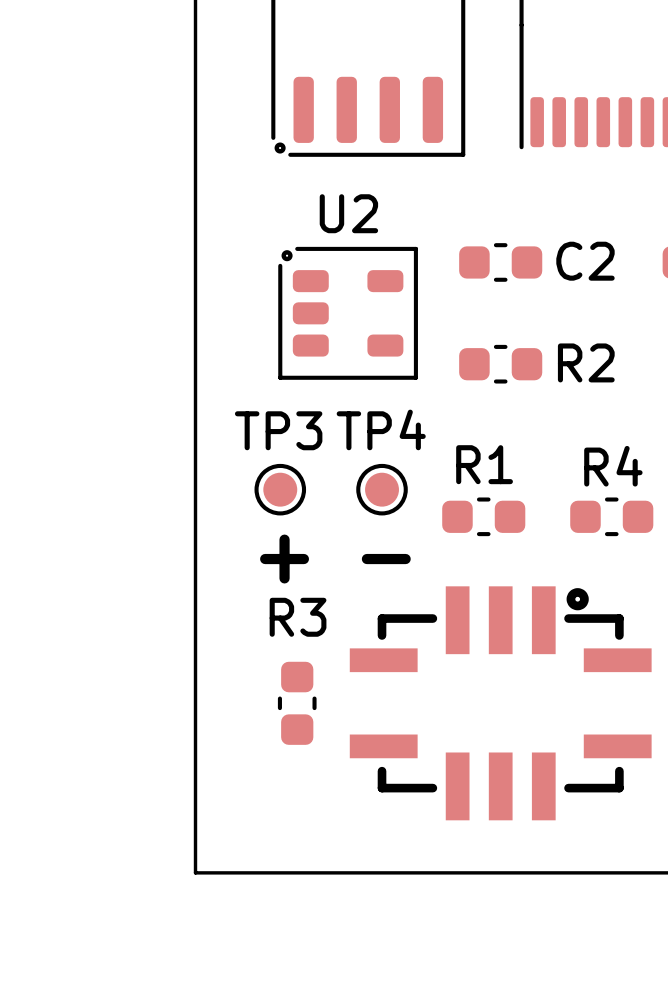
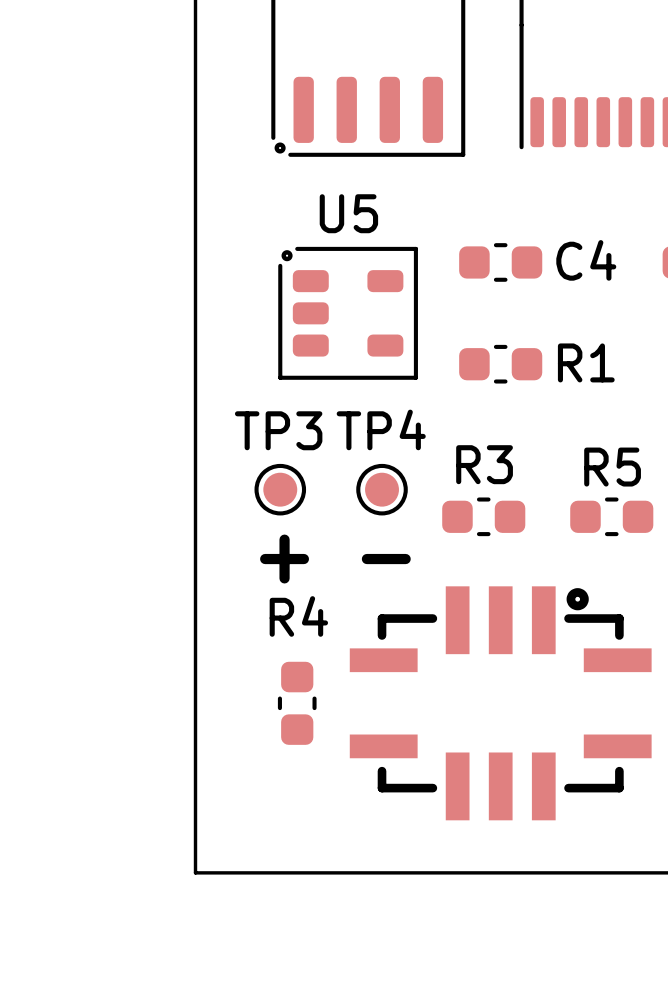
U2 name: U2 (348, 213) -> U5 (348, 213)
C2 name: C2 (585, 261) -> C4 (586, 260)
R2 name: R2 (586, 362) -> R1 (586, 362)
R1 name: R1 (484, 464) -> R3 (484, 464)
R4 name: R4 (613, 466) -> R5 (612, 467)
R3 name: R3 (298, 617) -> R4 (298, 616)

